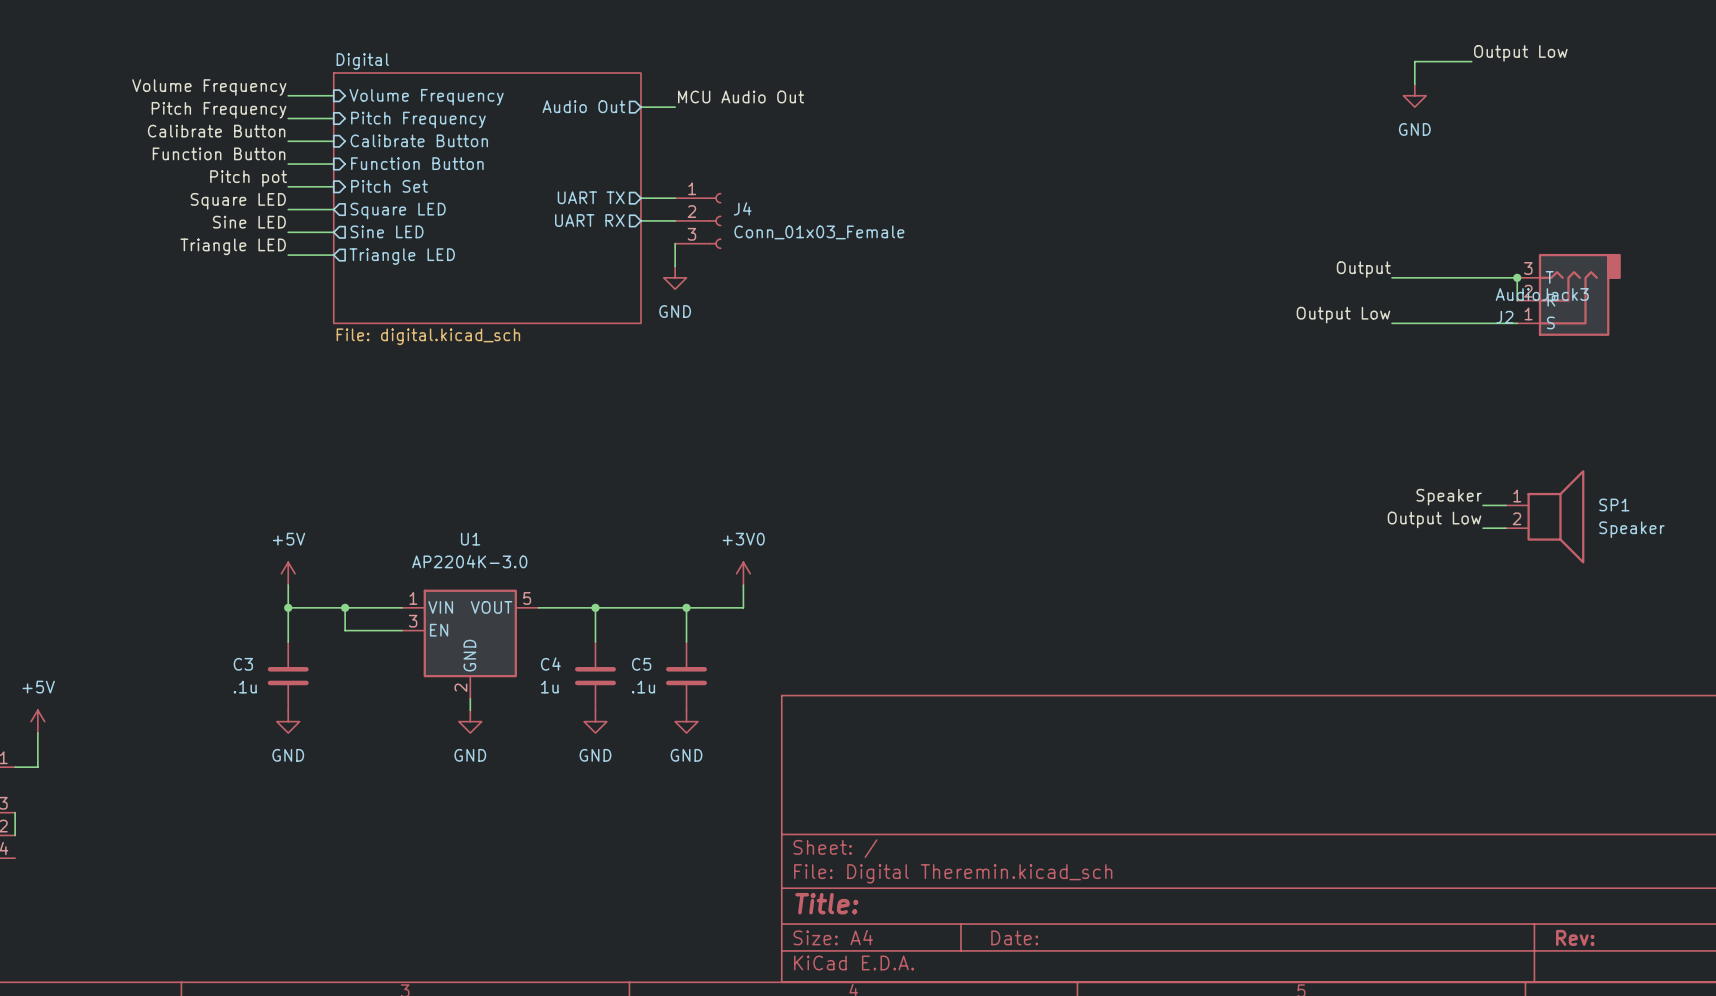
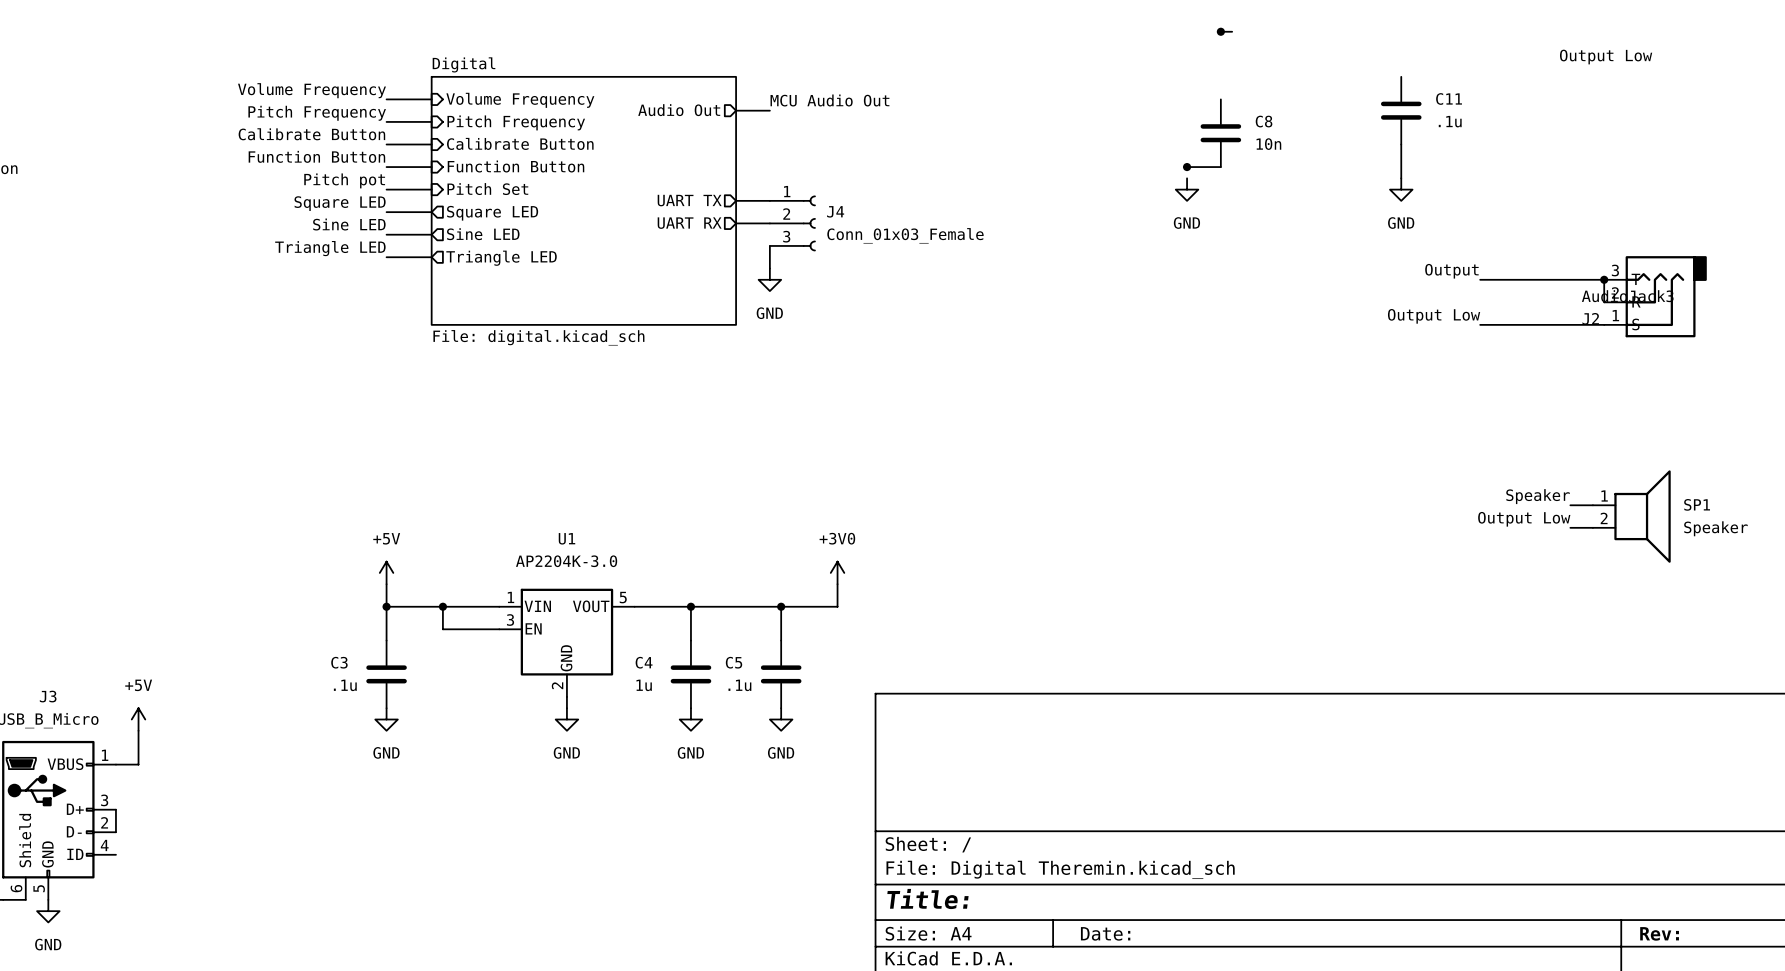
wire: none -> (1220, 31) (1232, 31)
junction: none -> (1220, 31)
wire: (1471, 61) (1414, 61) (1414, 84) -> none
power symbol position: GND (1414, 95) -> GND (1401, 189)
C11: none -> .1u (1401, 110)
C8: none -> 10n (1220, 133)
wire: none -> (1401, 144) (1401, 178)
wire: none -> (1187, 167) (1220, 167)
junction: none -> (1187, 167)
power symbol: none -> GND (1187, 189)

